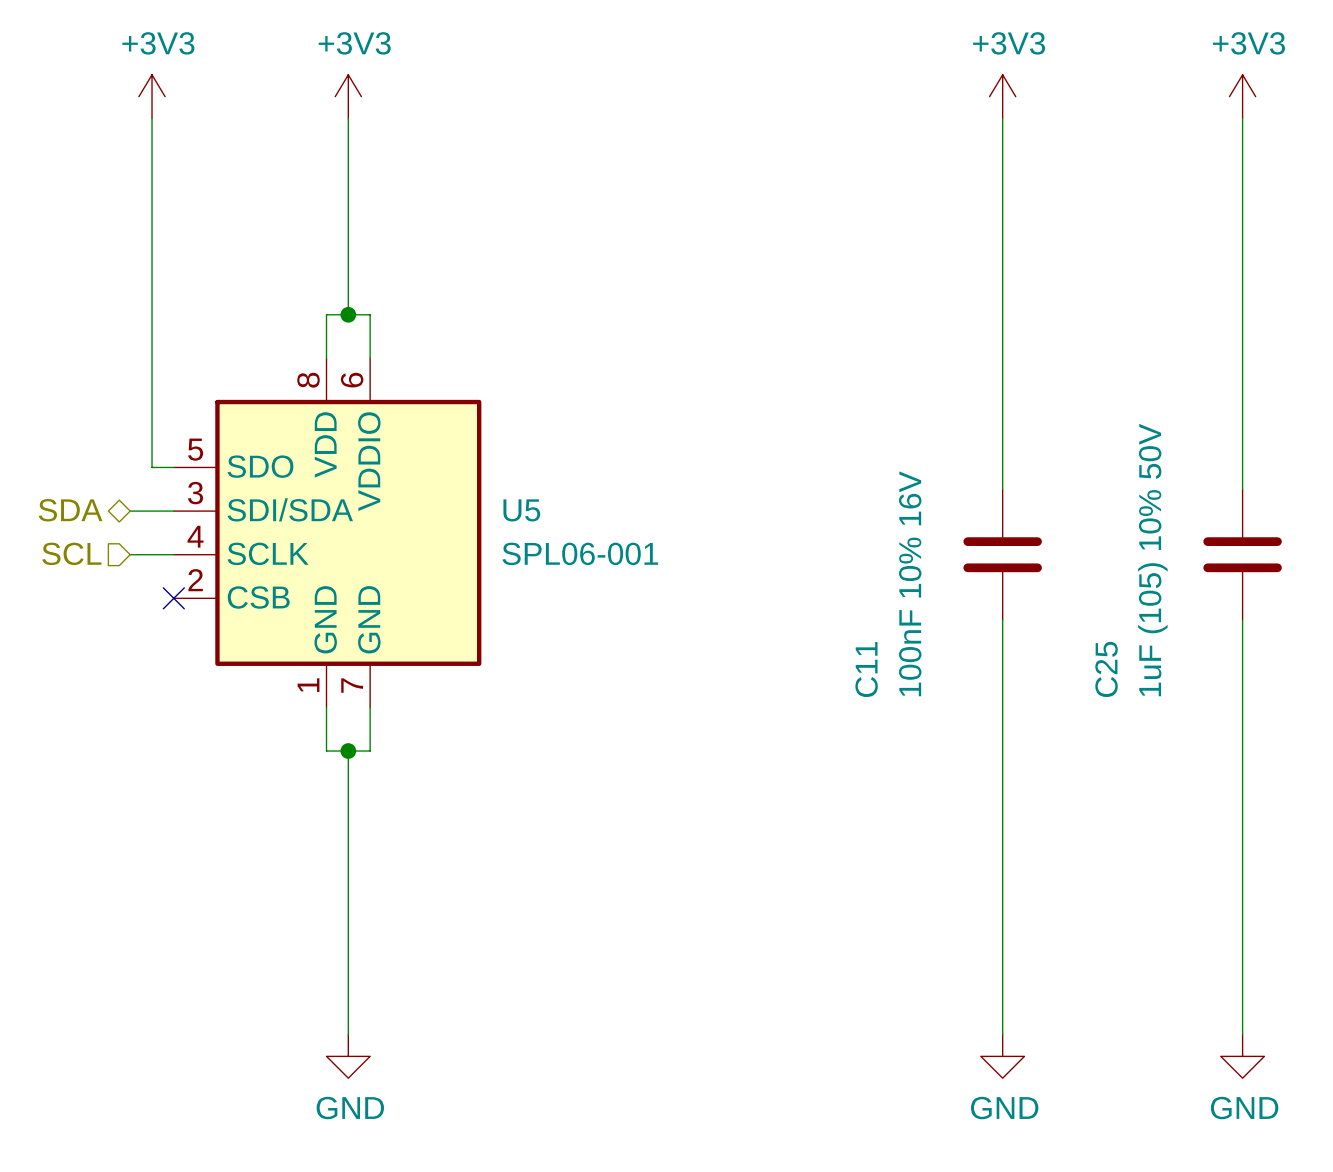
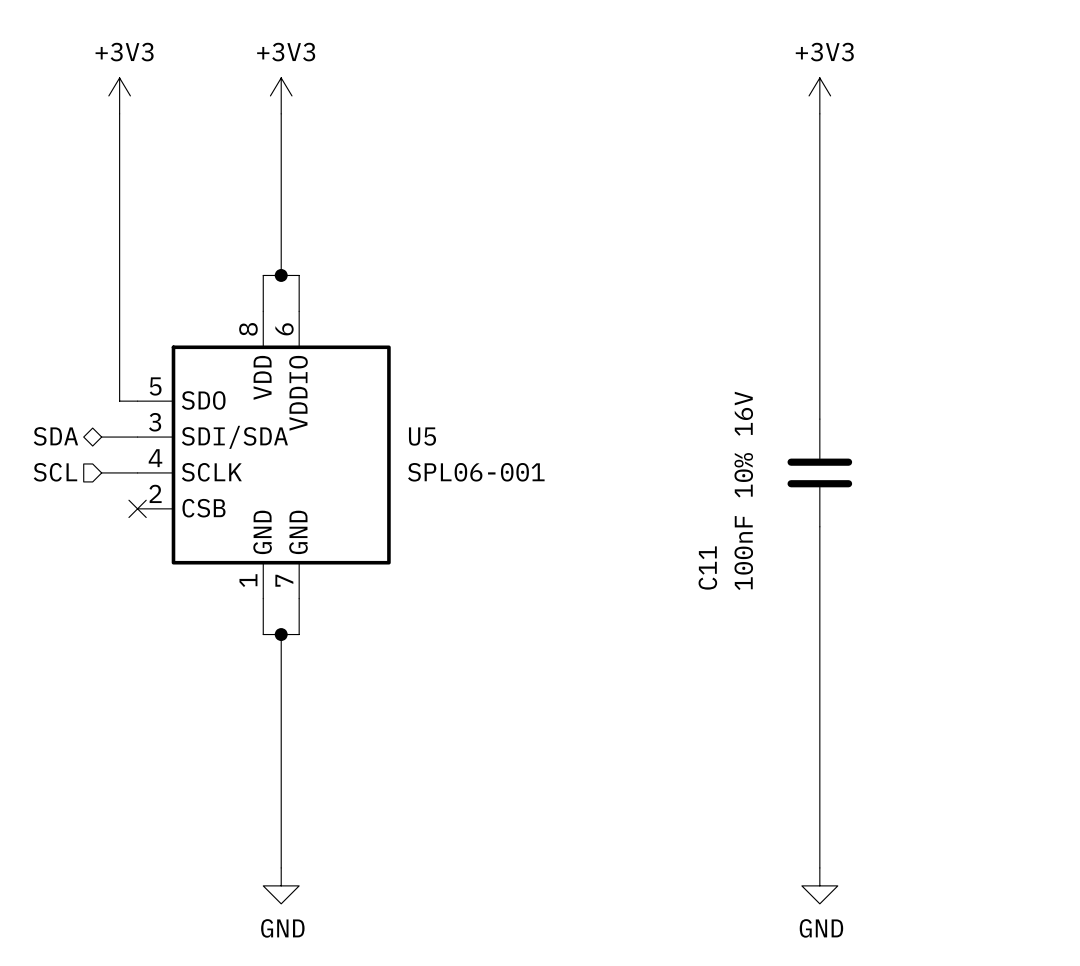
power symbol: +3V3 (1242, 96) -> none
wire: (1242, 118) (1242, 489) -> none
C25: 1uF (105) 10% 50V (1242, 554) -> none
wire: (1242, 620) (1242, 1034) -> none
power symbol: GND (1242, 1056) -> none

